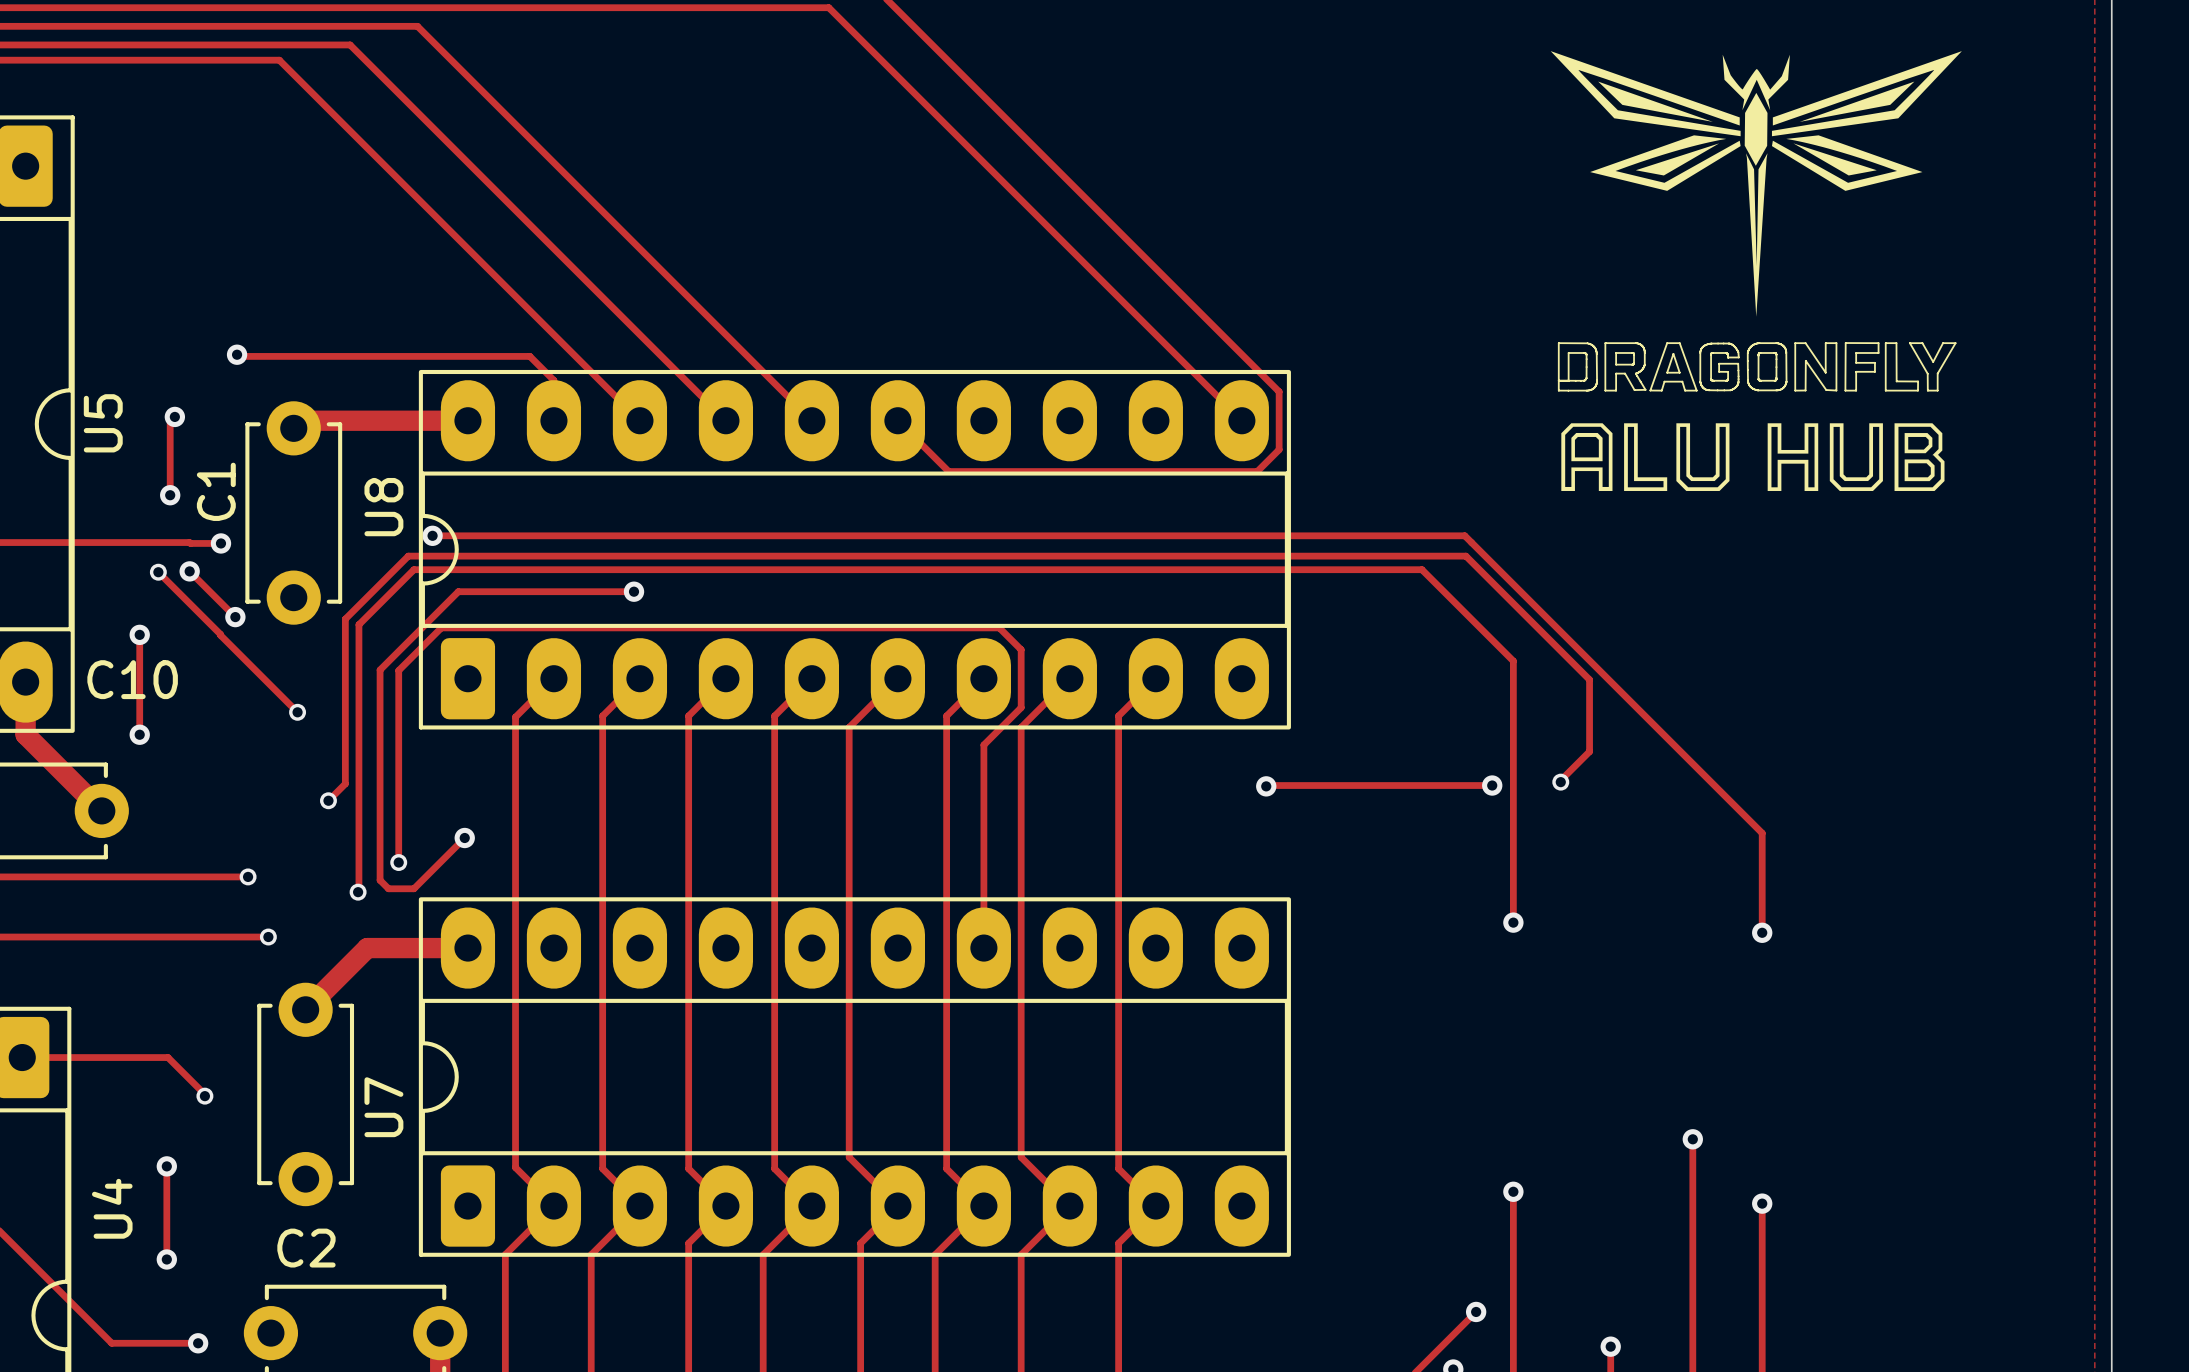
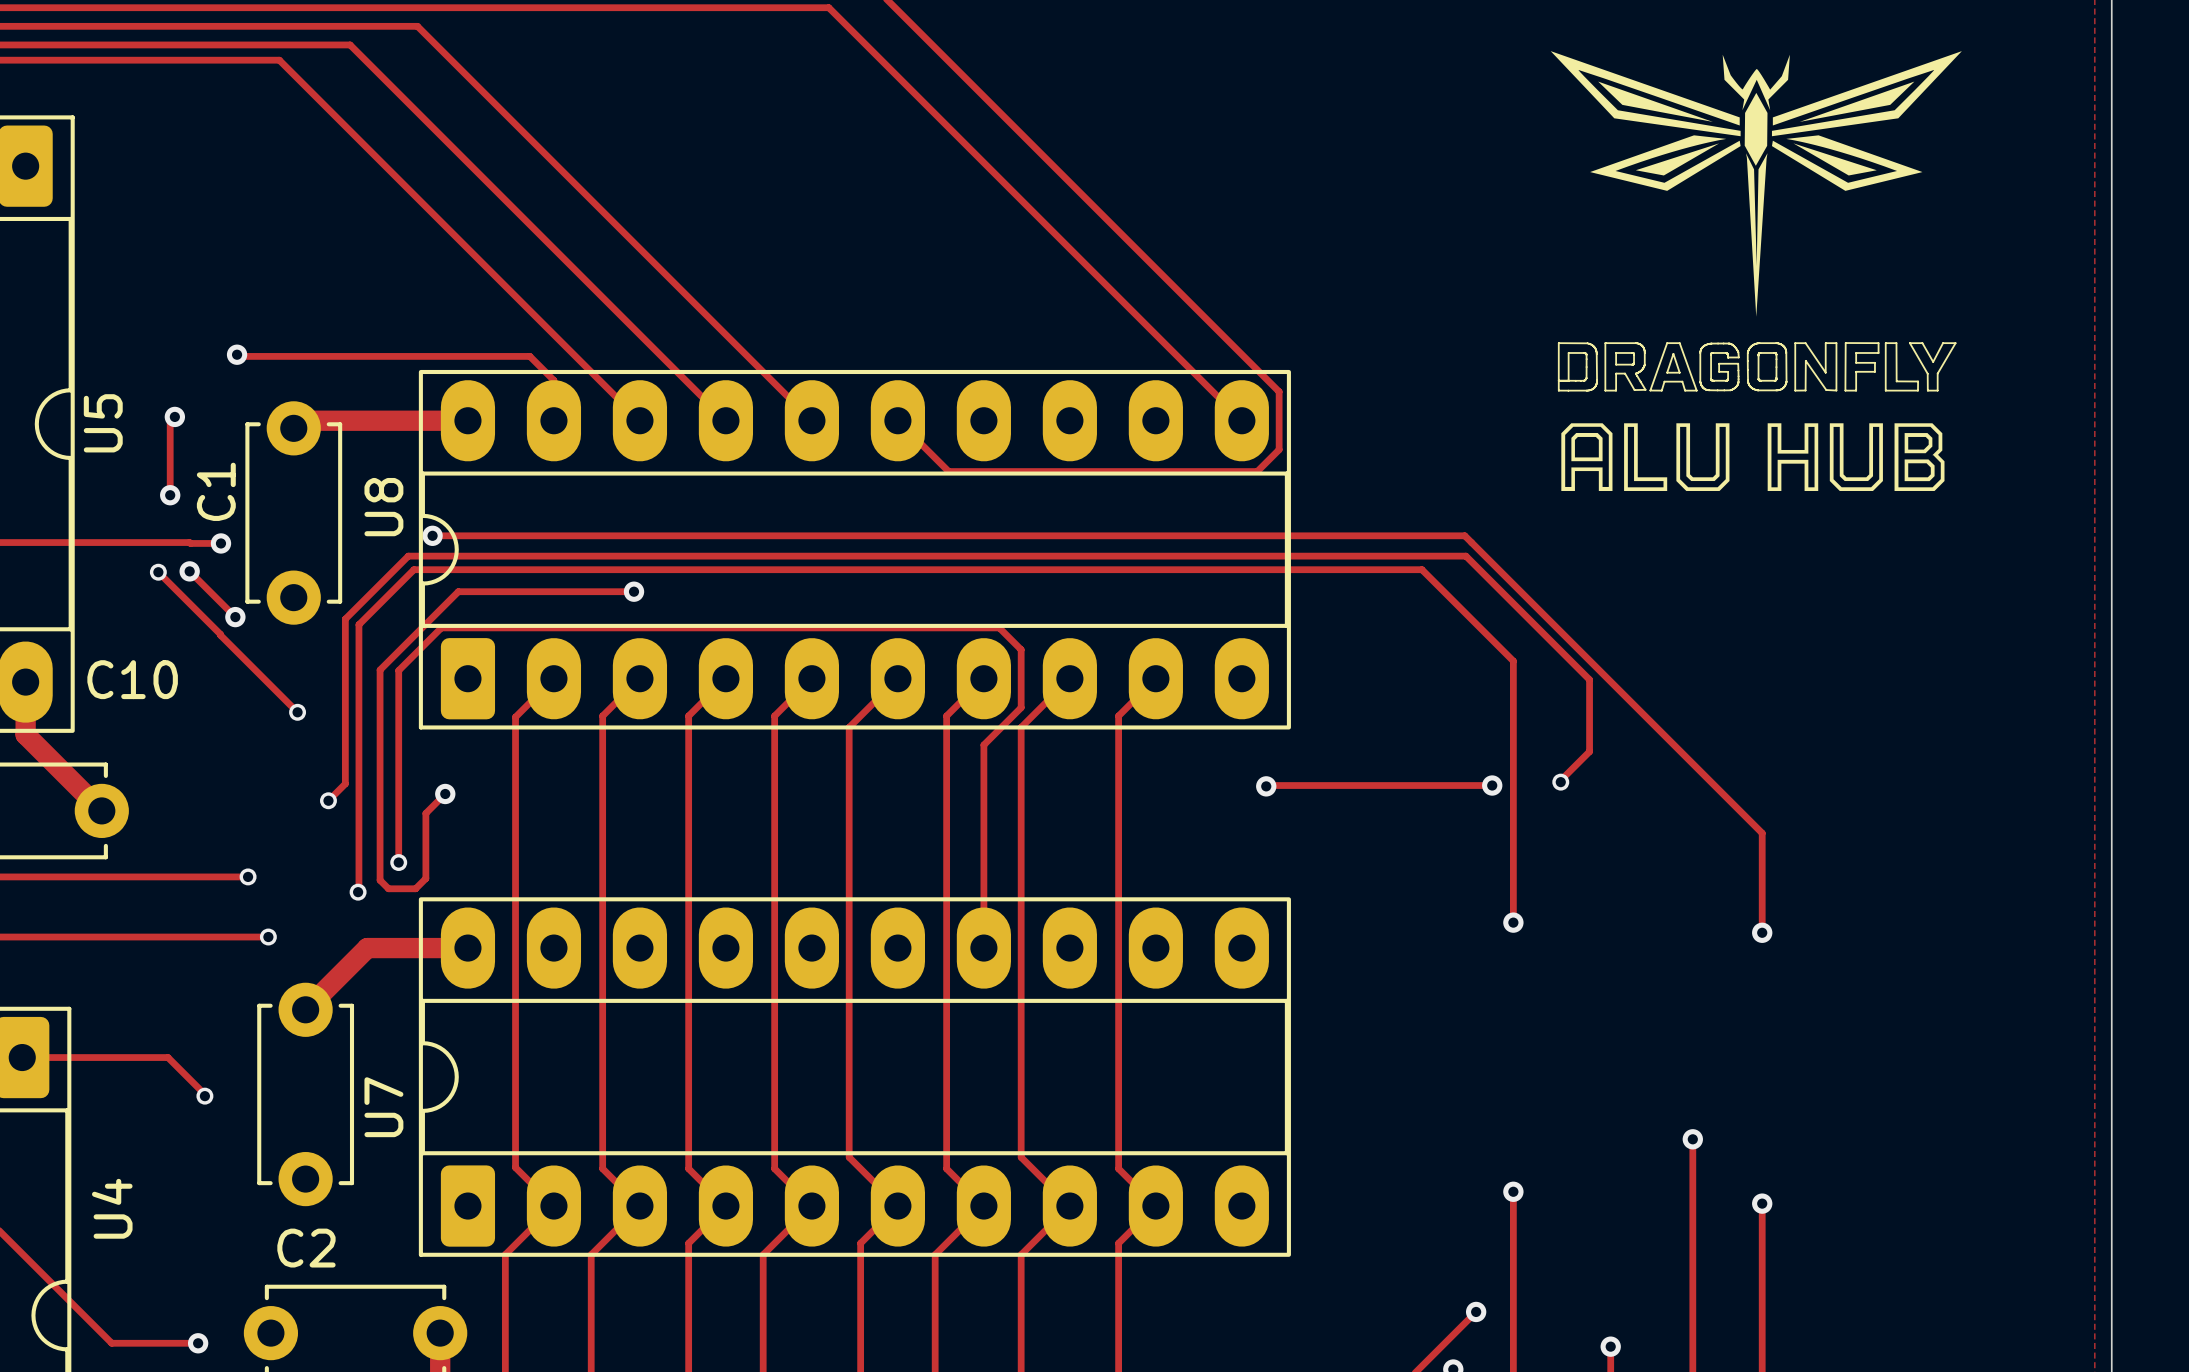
track: (139, 634) (139, 734) -> none
via: (139, 634) -> none
via: (139, 734) -> none
track: (464, 837) (413, 888) -> (445, 793) (425, 813) (425, 878) (413, 888)
via position: (464, 837) -> (445, 793)
track: (166, 1166) (166, 1259) -> none
via: (166, 1166) -> none
via: (166, 1259) -> none

